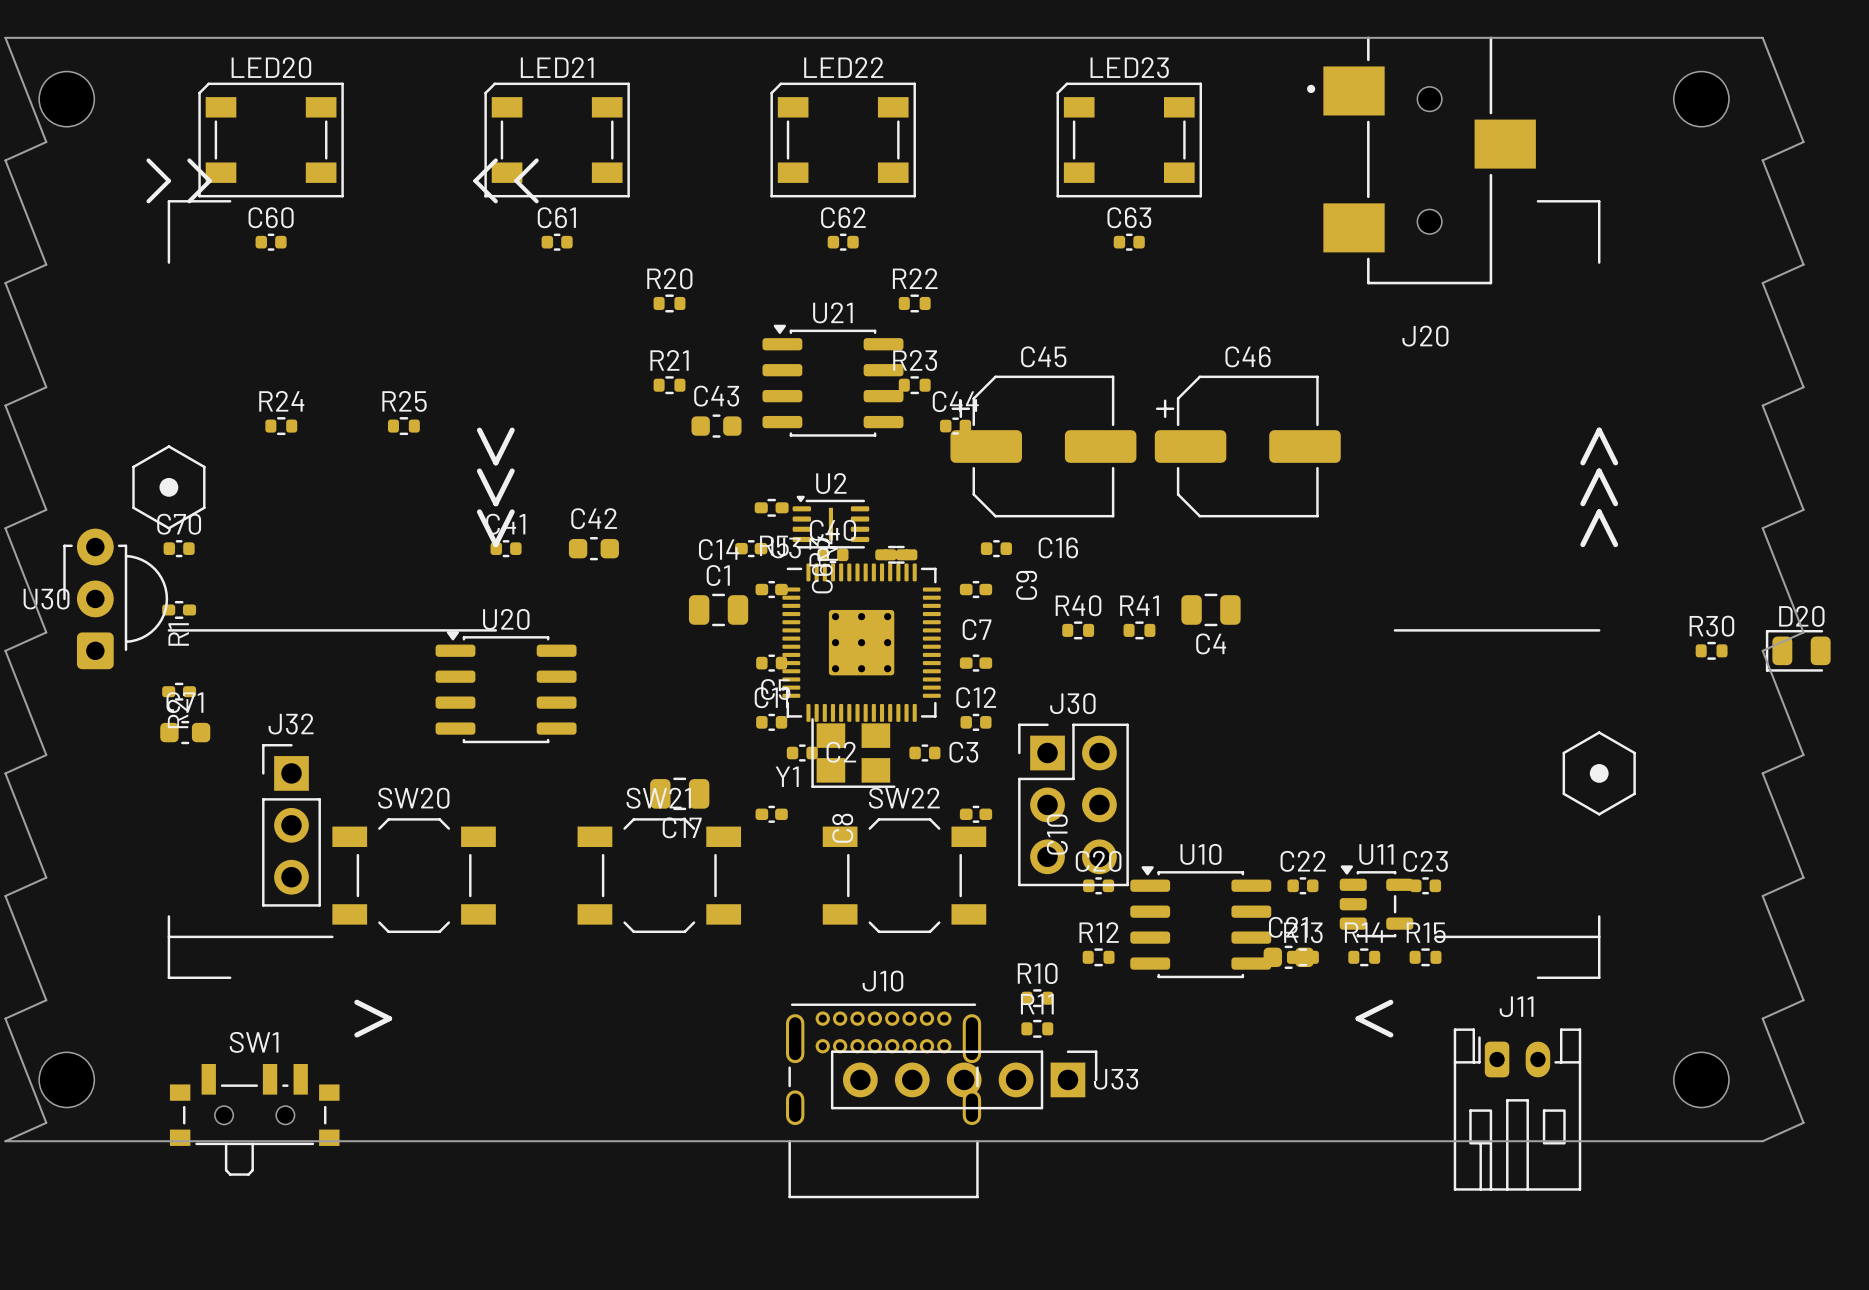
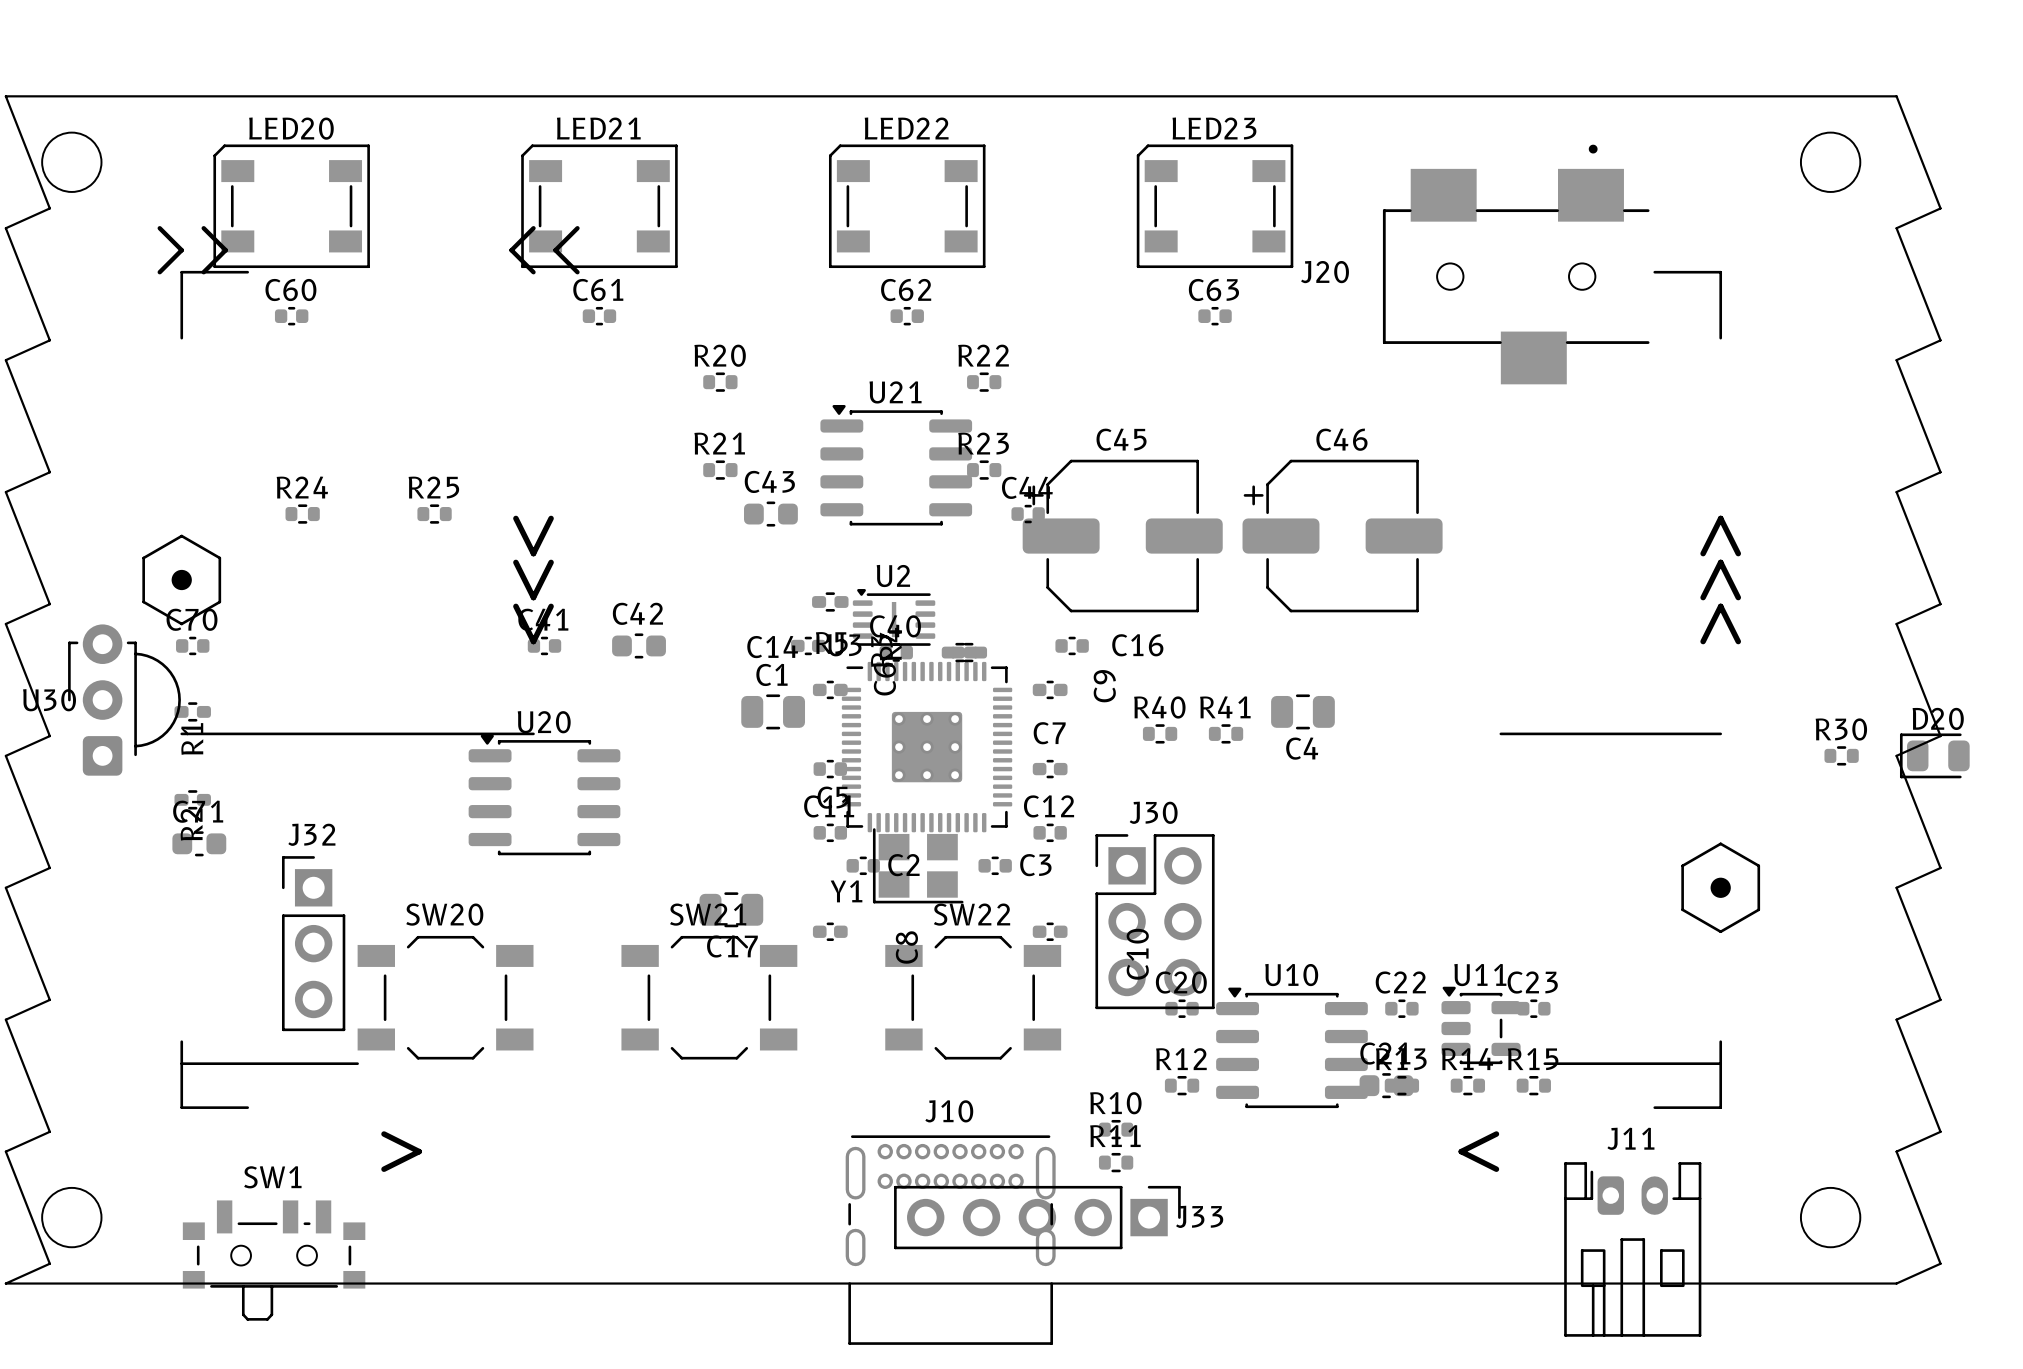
J20 footprint: [1307, 36, 1536, 285] -> [1382, 144, 1650, 385]
J20 name position: J20 (1425, 336) -> J20 (1325, 272)

